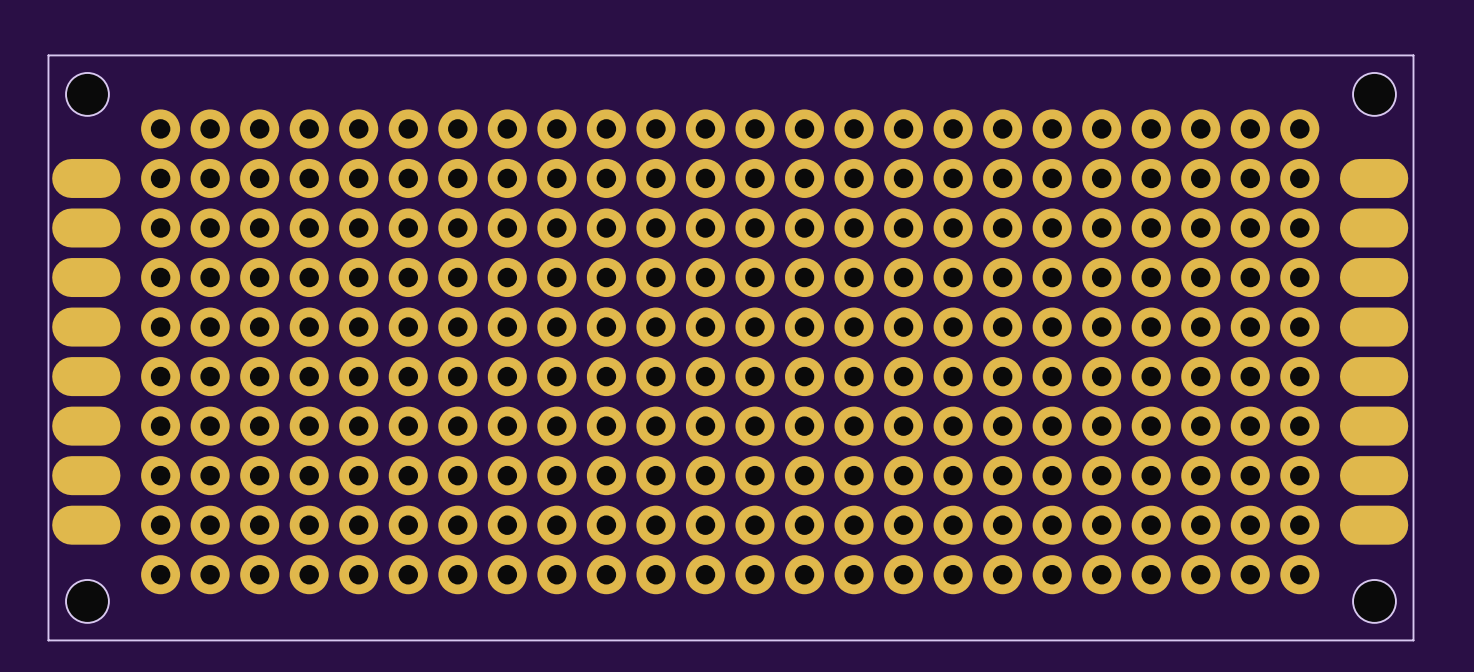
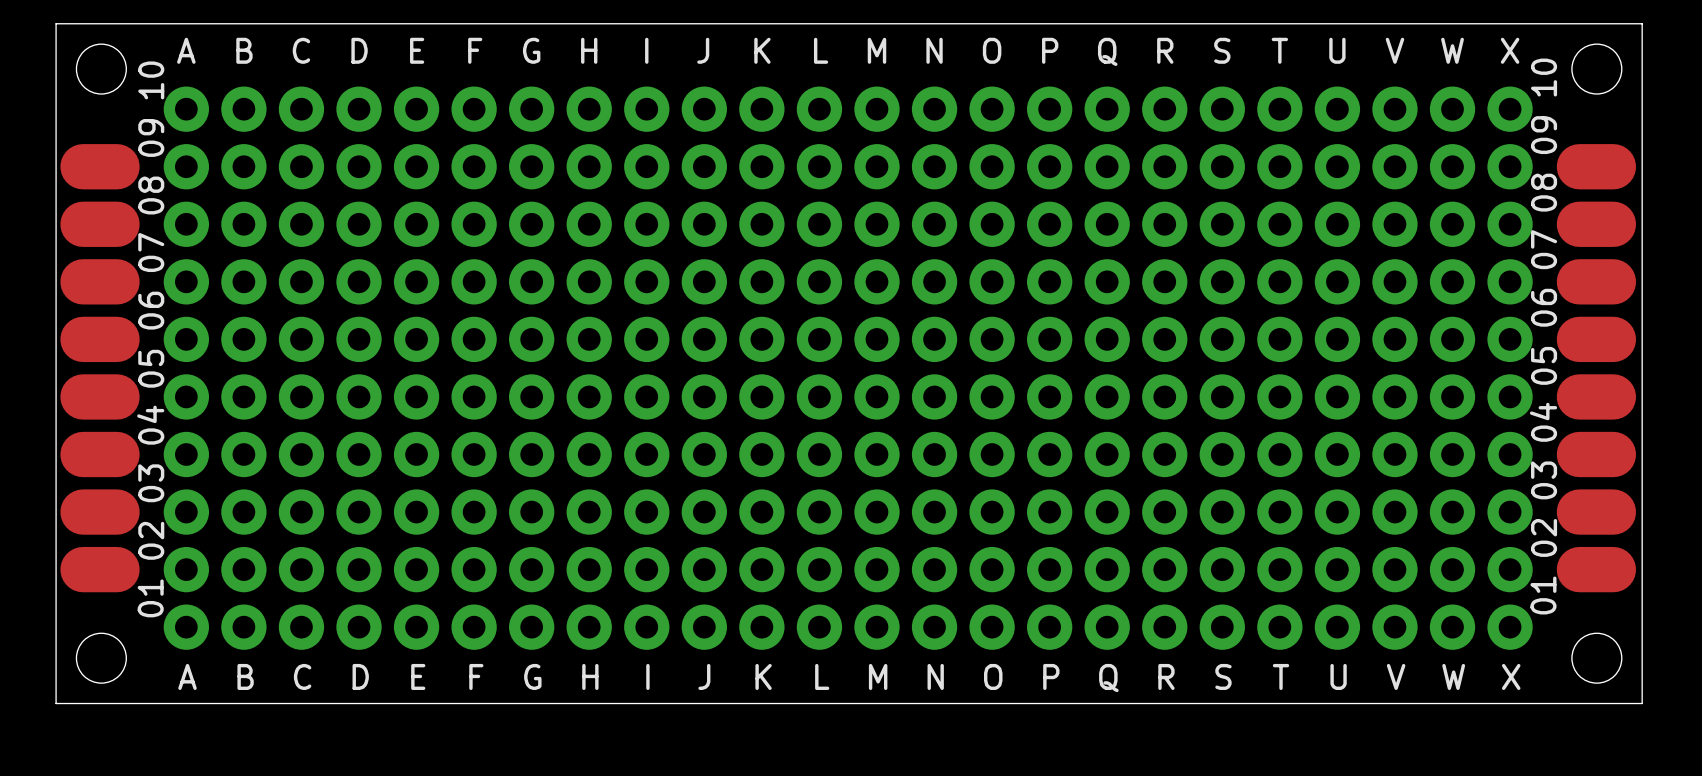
text: none -> A (186, 50)
text: none -> B (244, 50)
text: none -> C (301, 50)
text: none -> D (359, 50)
text: none -> E (417, 50)
text: none -> F (475, 50)
text: none -> G (531, 50)
text: none -> H (589, 50)
text: none -> I (646, 50)
text: none -> J (703, 50)
text: none -> K (762, 50)
text: none -> L (821, 50)
text: none -> M (876, 50)
text: none -> N (934, 50)
text: none -> O (992, 50)
text: none -> P (1050, 50)
text: none -> R (1165, 50)
text: none -> S (1222, 50)
text: none -> T (1279, 50)
text: none -> U (1337, 50)
text: none -> V (1394, 50)
text: none -> W (1452, 50)
text: none -> X (1510, 50)
text: none -> Q (1107, 51)
text: none -> 10 (1544, 77)
text: none -> 10 (151, 80)
text: none -> 09 (1544, 135)
text: none -> 09 (151, 137)
text: none -> 08 (1544, 192)
text: none -> 08 (151, 195)
text: none -> 07 (1544, 249)
text: none -> 07 (151, 252)
text: none -> 06 (1544, 307)
text: none -> 06 (151, 310)
text: none -> 05 (1544, 365)
text: none -> 05 (151, 368)
text: none -> 04 (1543, 422)
text: none -> 04 (150, 425)
text: none -> 03 (1544, 480)
text: none -> 03 (151, 483)
text: none -> 02 (1544, 537)
text: none -> 02 (151, 540)
text: none -> 01 (1543, 595)
text: none -> 01 (150, 598)
text: none -> A (187, 676)
text: none -> B (245, 676)
text: none -> C (302, 676)
text: none -> D (360, 676)
text: none -> E (418, 676)
text: none -> F (476, 676)
text: none -> G (532, 676)
text: none -> H (590, 676)
text: none -> I (647, 676)
text: none -> J (704, 676)
text: none -> K (763, 676)
text: none -> L (822, 676)
text: none -> M (878, 676)
text: none -> N (935, 676)
text: none -> O (993, 676)
text: none -> P (1051, 676)
text: none -> R (1166, 676)
text: none -> S (1223, 676)
text: none -> T (1281, 676)
text: none -> U (1338, 676)
text: none -> V (1396, 676)
text: none -> W (1453, 676)
text: none -> X (1511, 676)
text: none -> Q (1108, 678)

